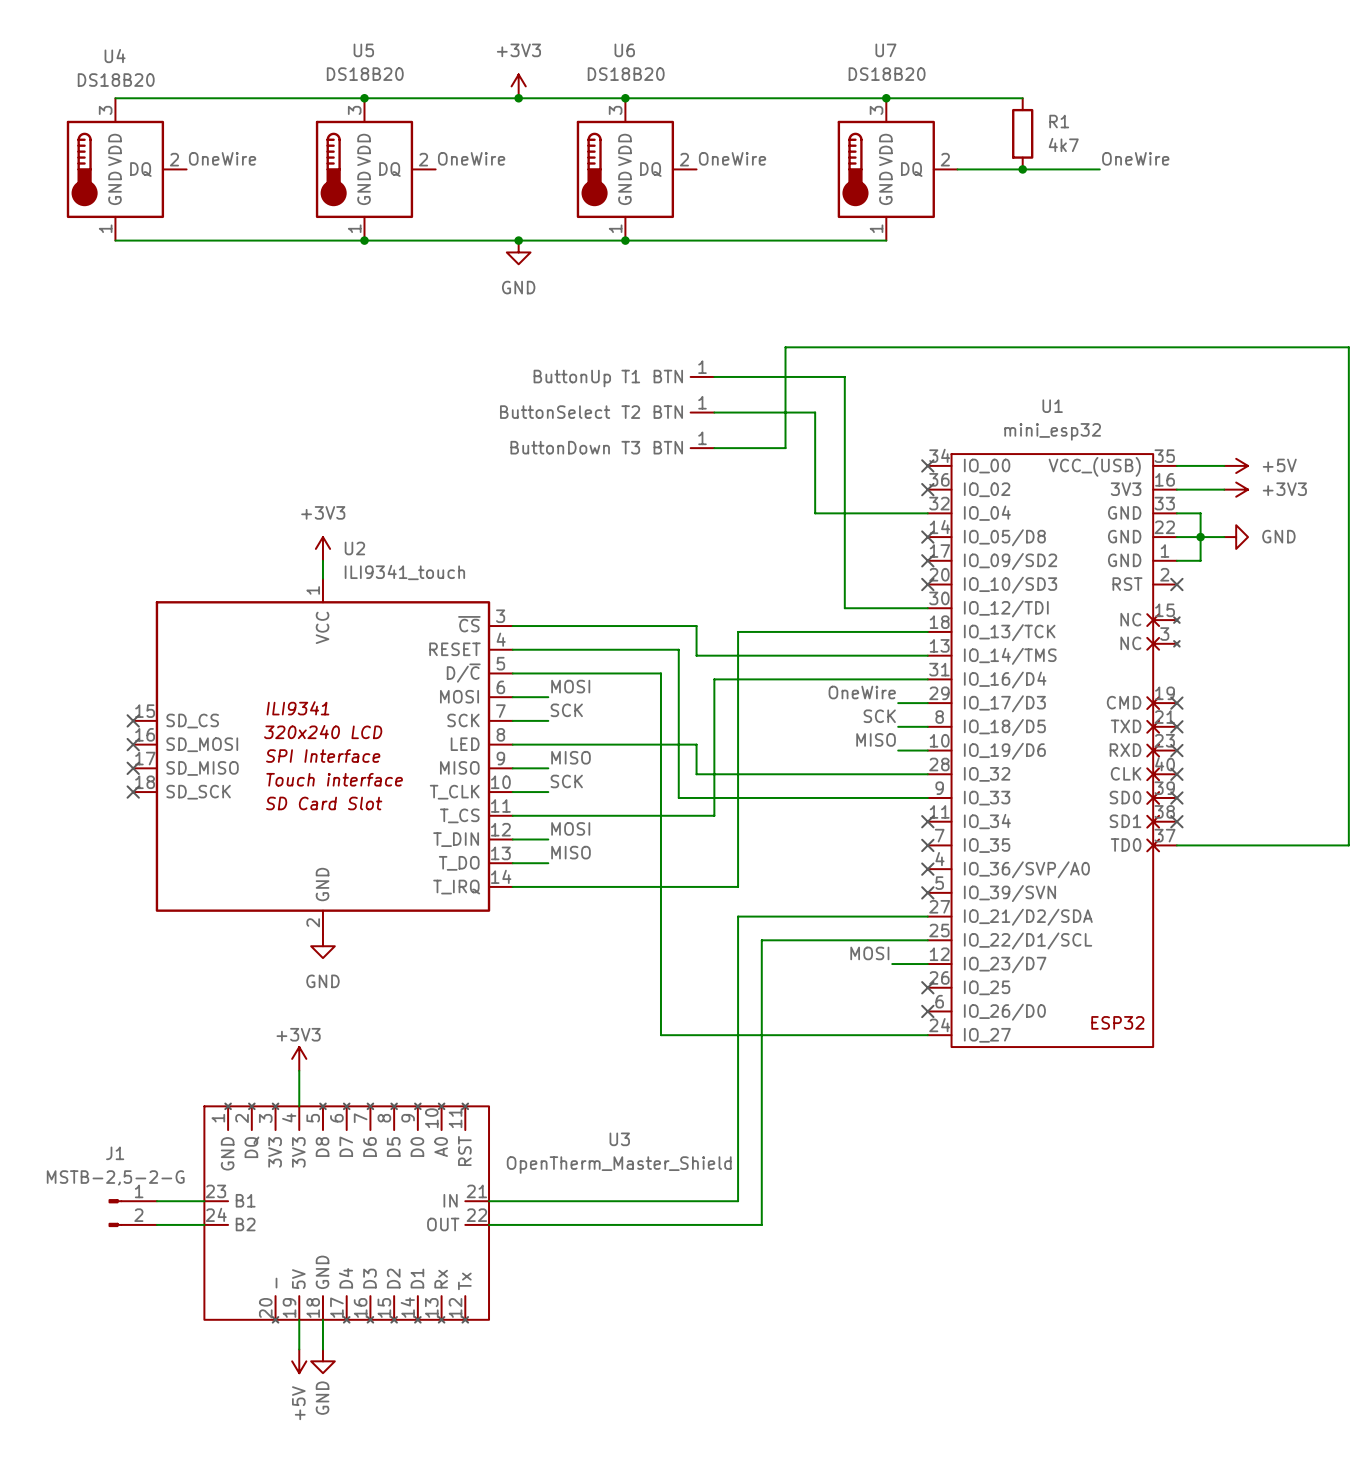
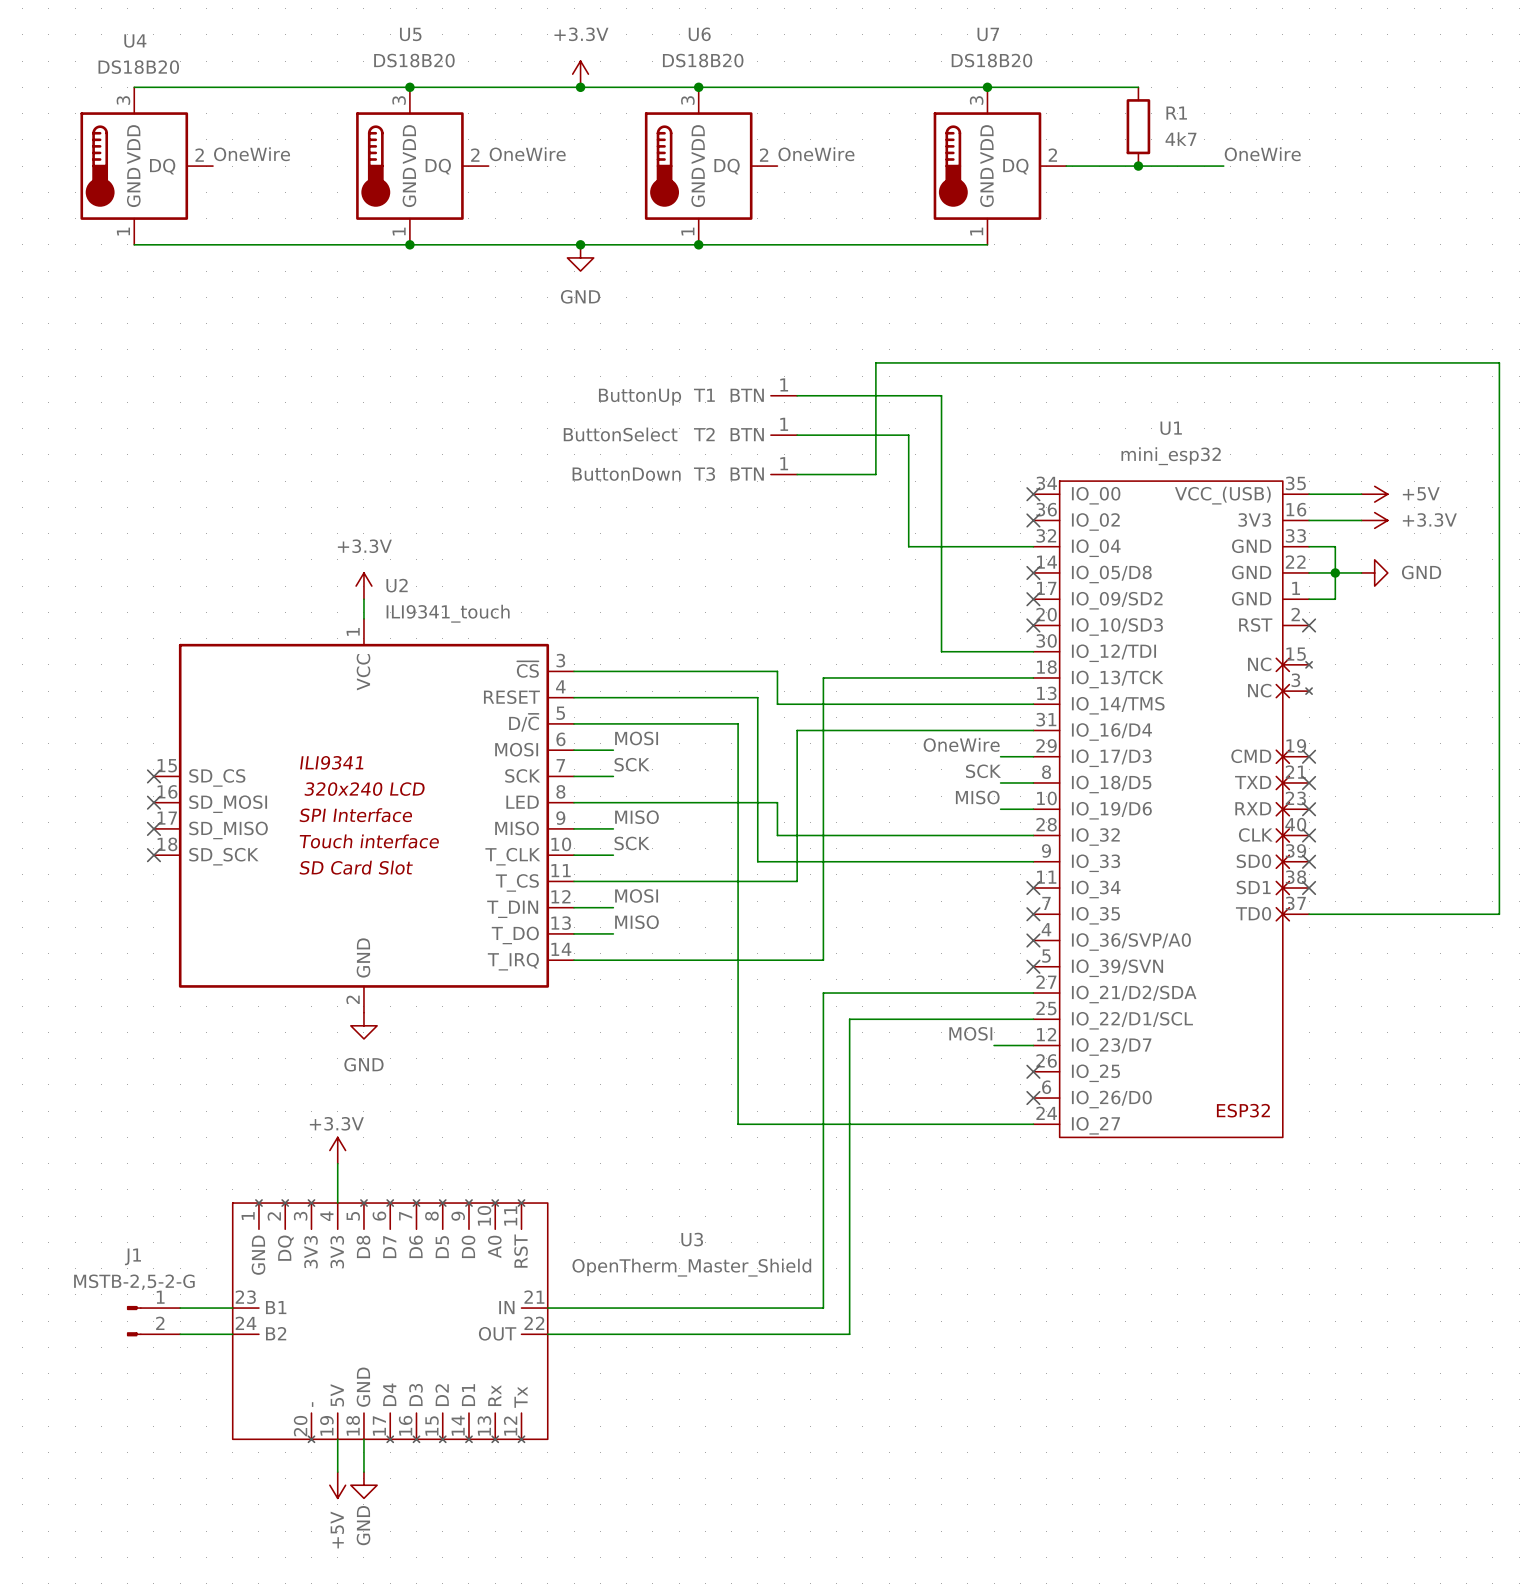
power symbol: +3V3 (518, 86) -> +3.3V (580, 74)
power symbol: +3V3 (1236, 489) -> +3.3V (1374, 520)
power symbol: +3V3 (322, 548) -> +3.3V (363, 586)
power symbol: +3V3 (299, 1058) -> +3.3V (337, 1150)

